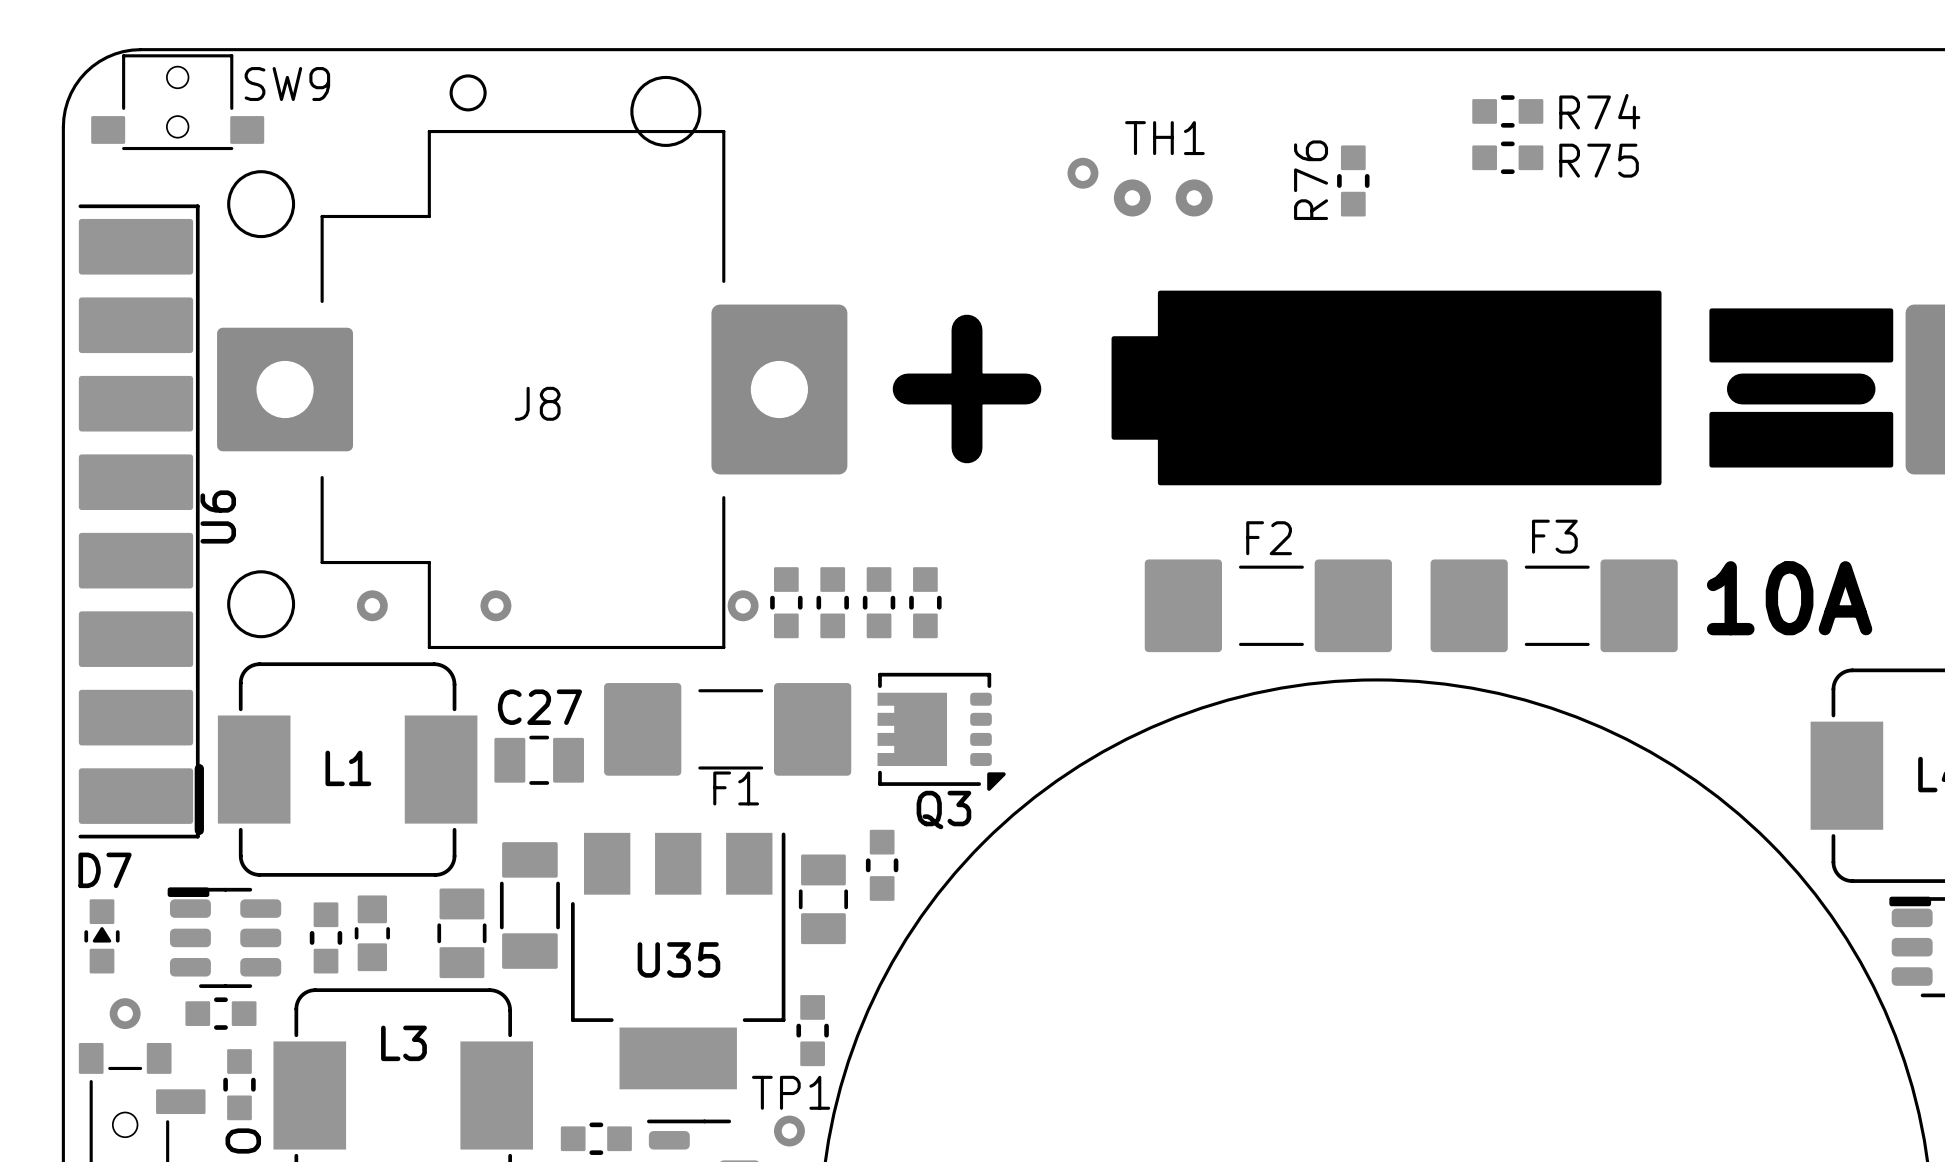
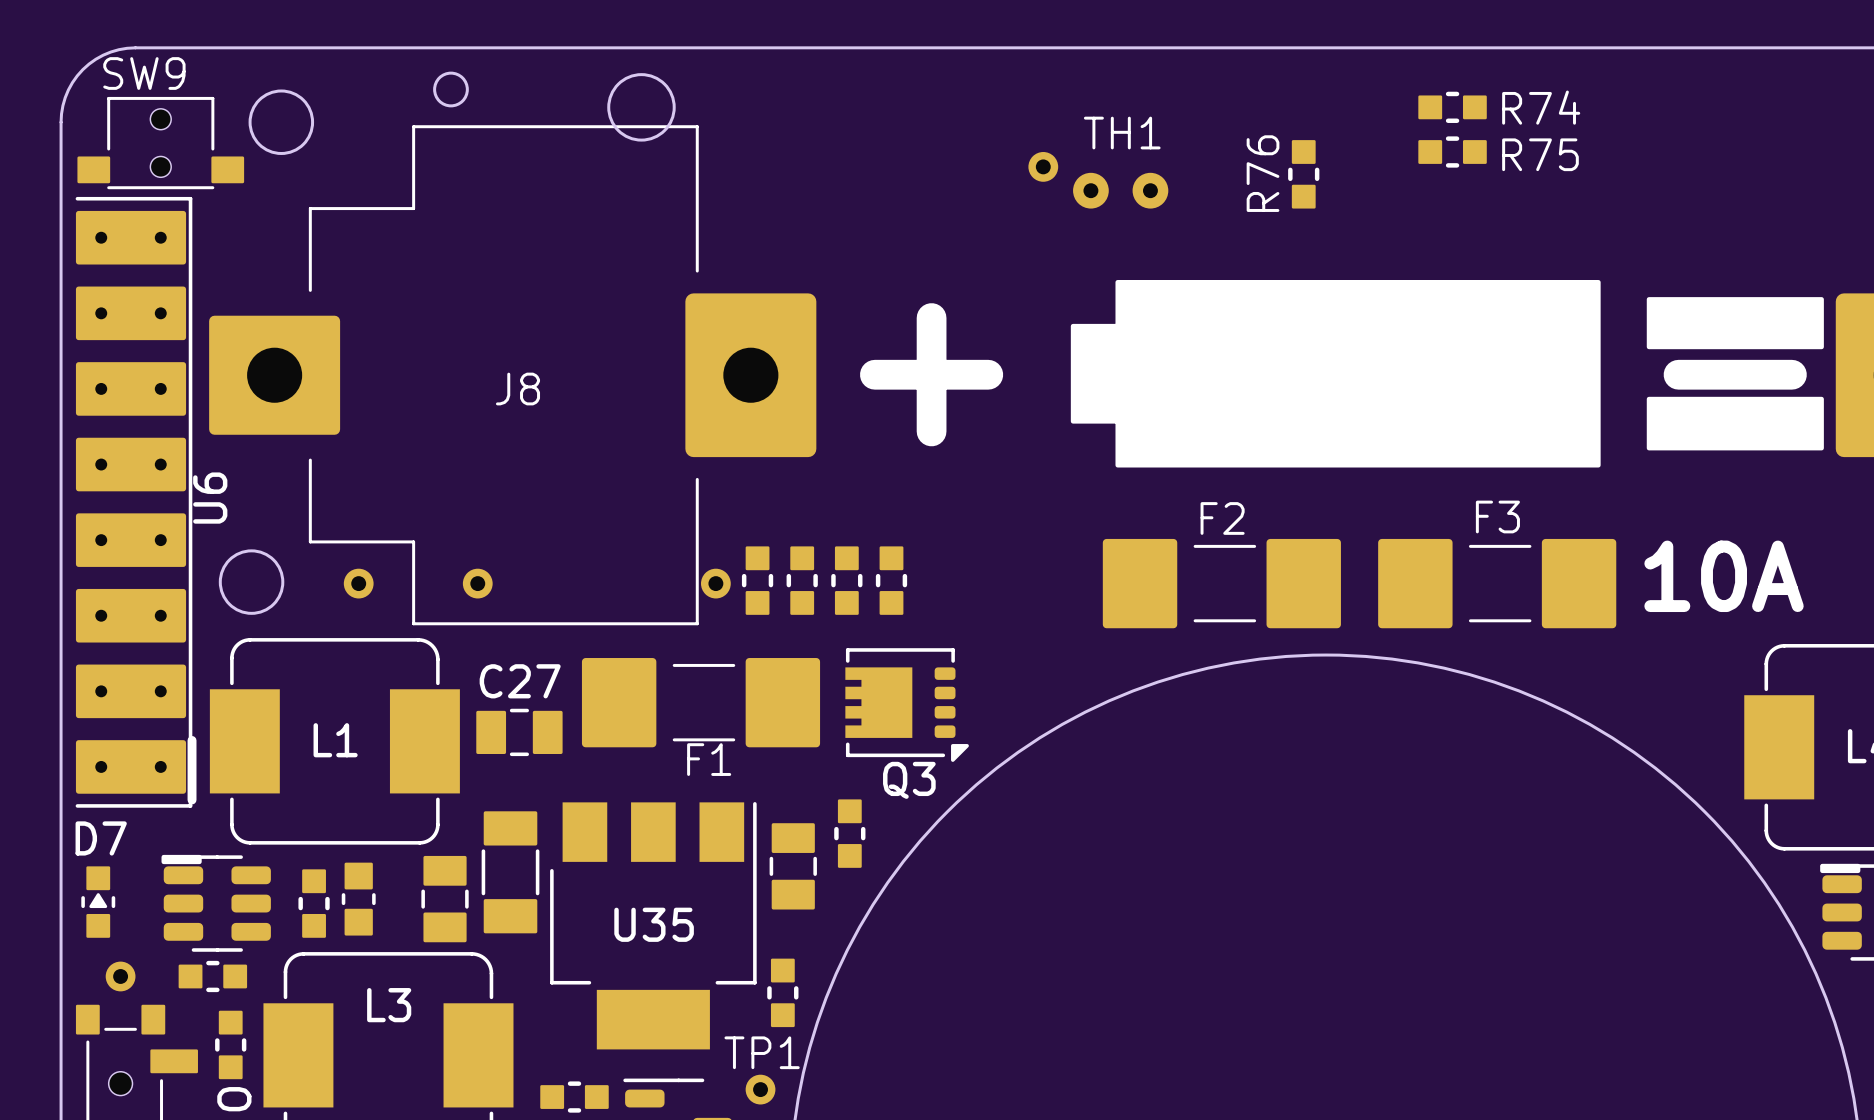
SW9 name position: SW9 (287, 84) -> SW9 (144, 73)
SW9 position: (177, 102) -> (160, 143)
U6 footprint: [78, 204, 204, 839] -> [75, 196, 197, 808]
round board edge position: (261, 204) -> (281, 122)

